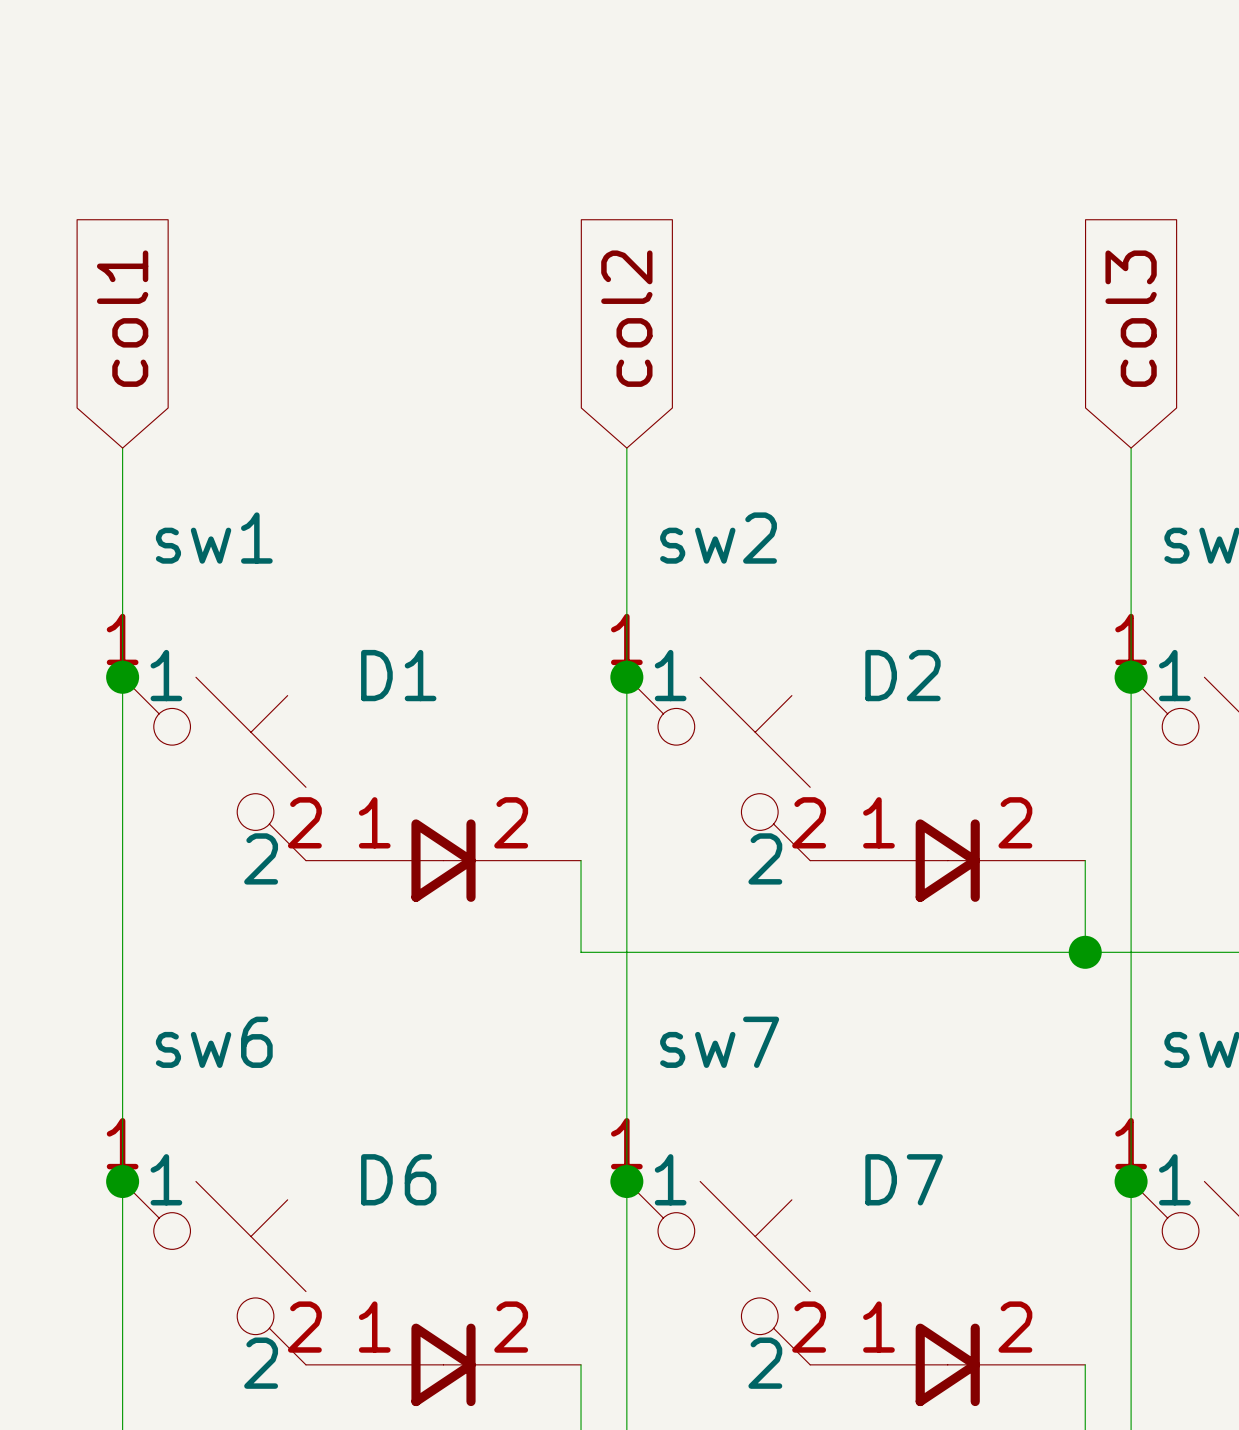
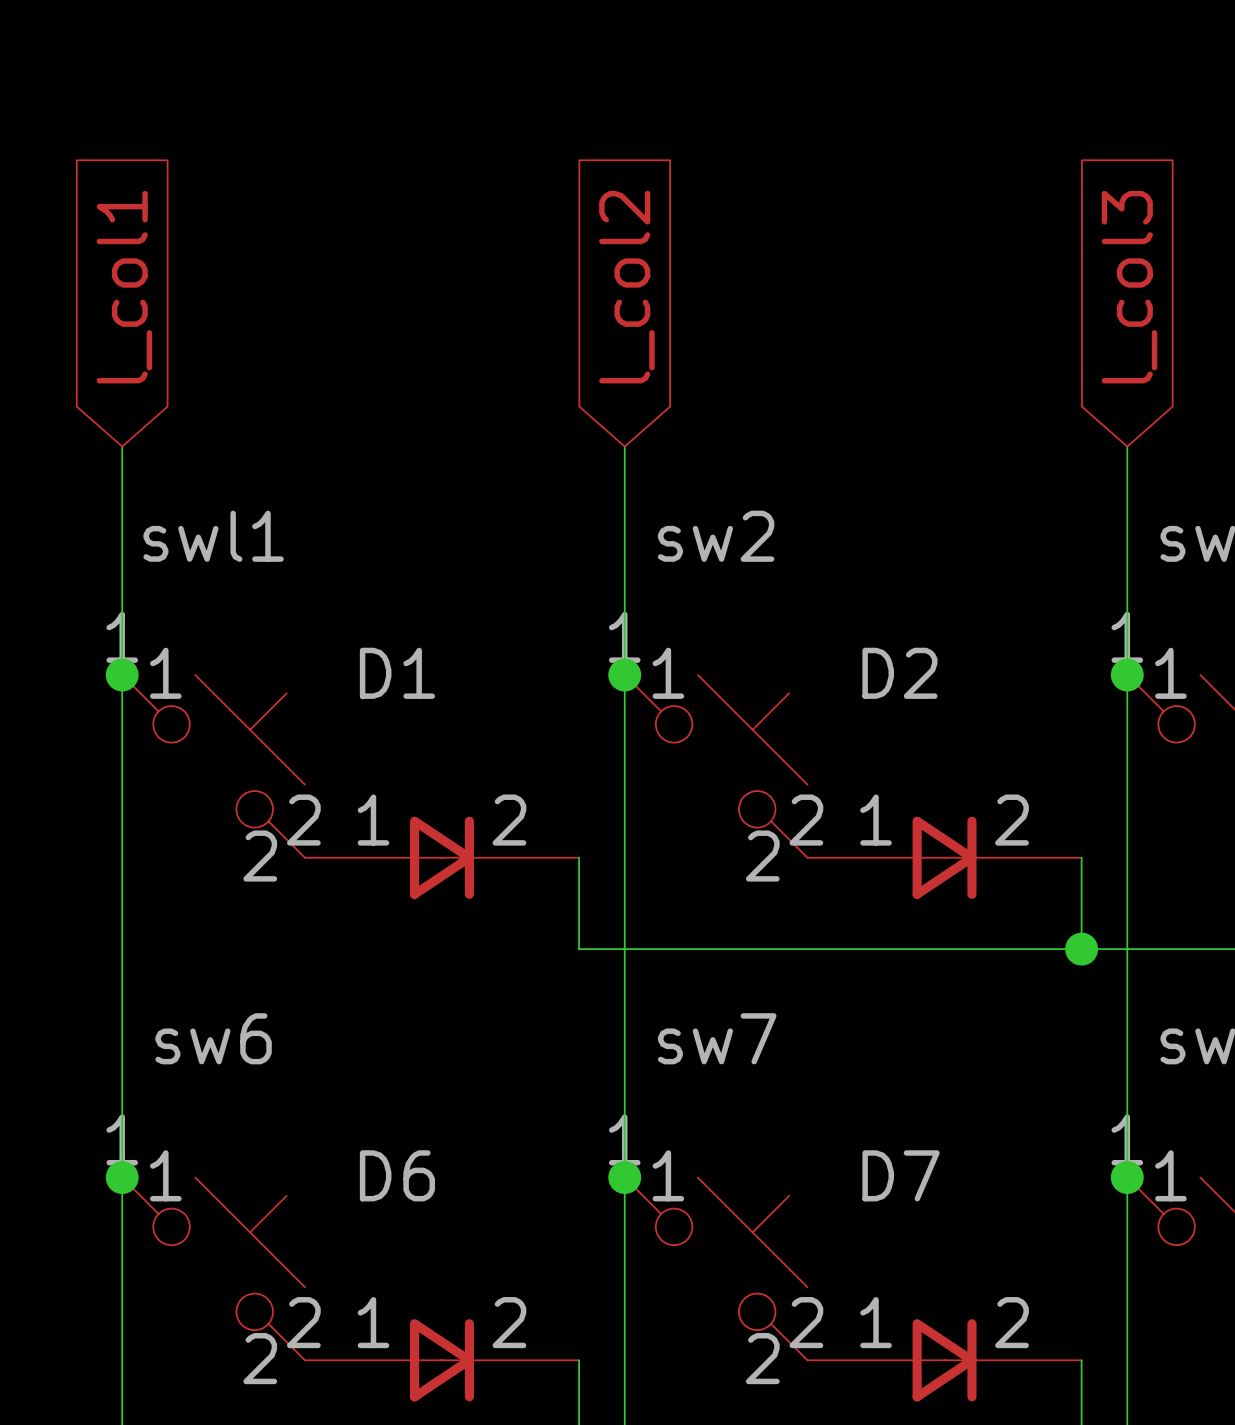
global label: col1 (122, 318) -> l_col1 (124, 287)
global label: col2 (626, 318) -> l_col2 (626, 287)
global label: col3 (1131, 318) -> l_col3 (1129, 287)
sw1 name: sw1 (214, 538) -> swl1 (213, 536)

